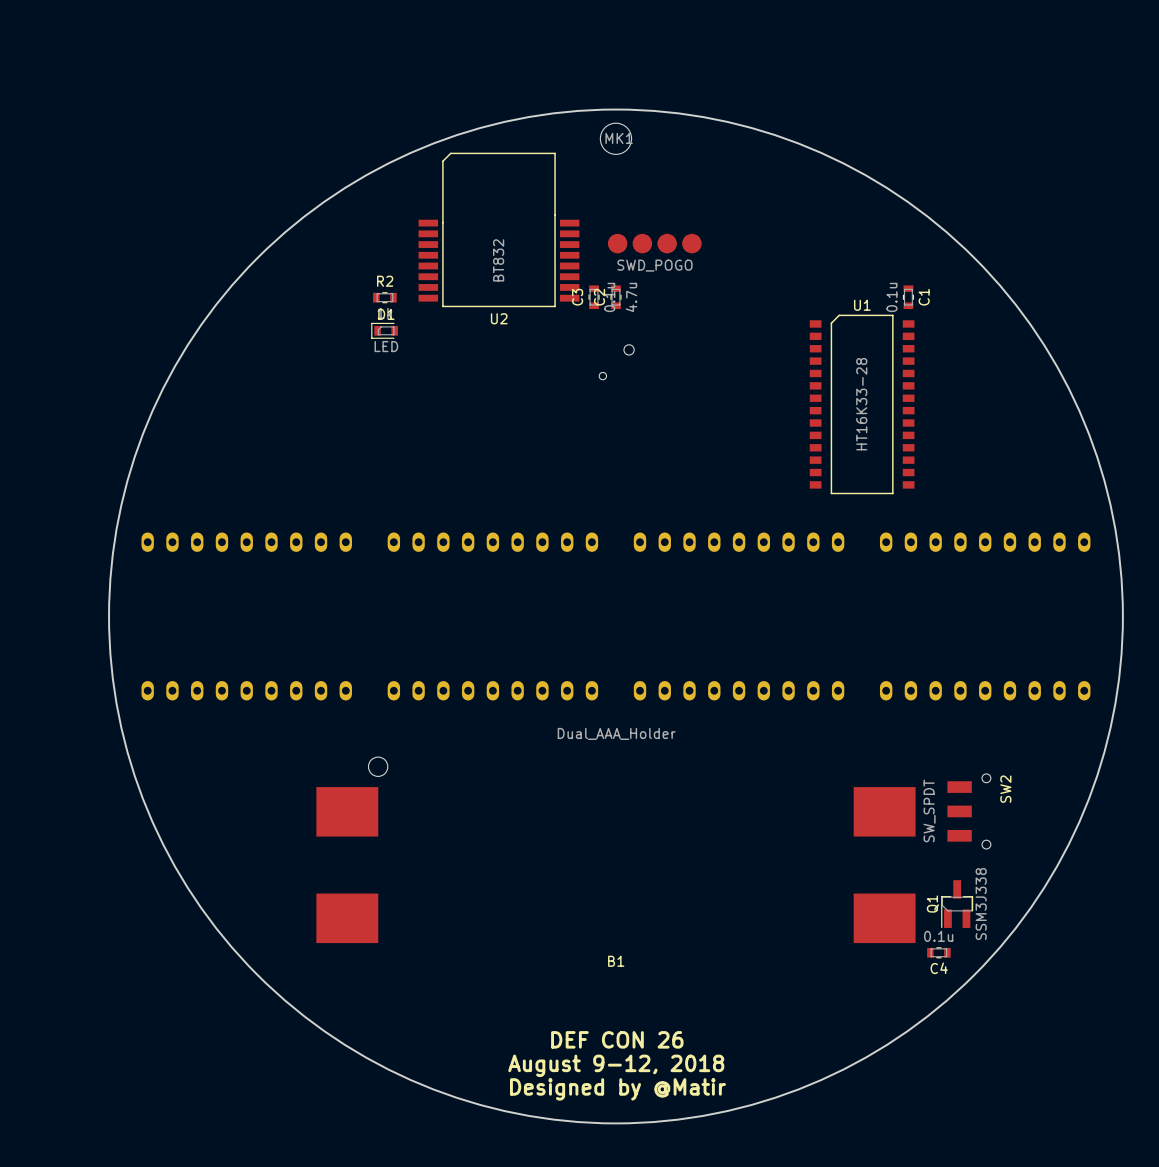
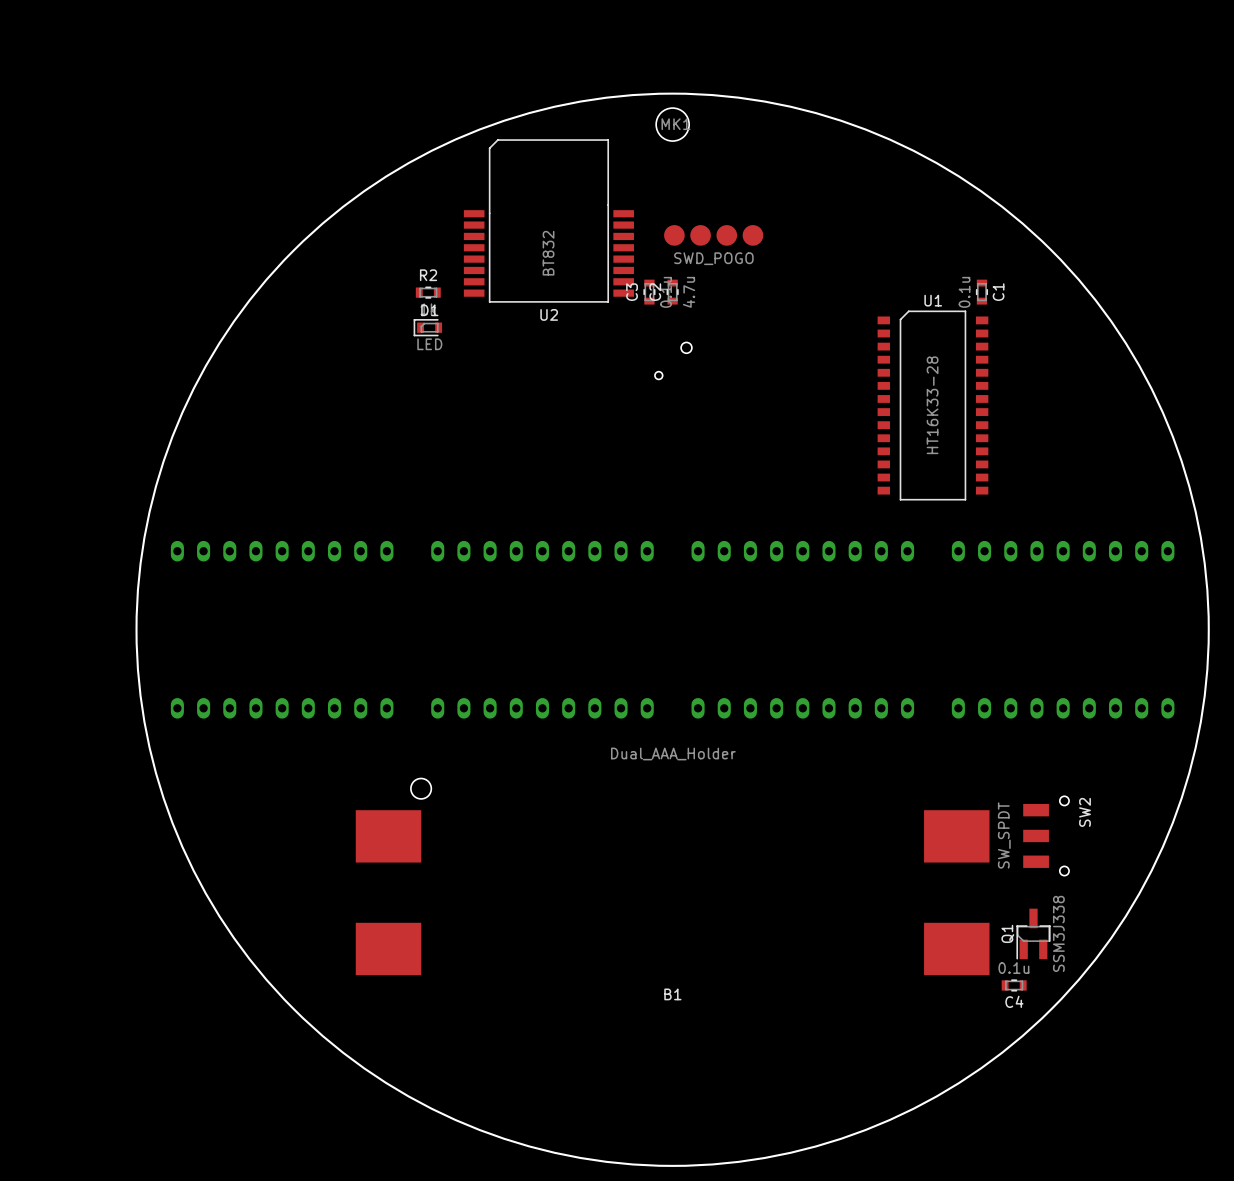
text: DEF CON 26 (617, 1039) -> none
text: August 9-12, 2018 (616, 1065) -> none
text: Designed by @Matir (617, 1089) -> none

